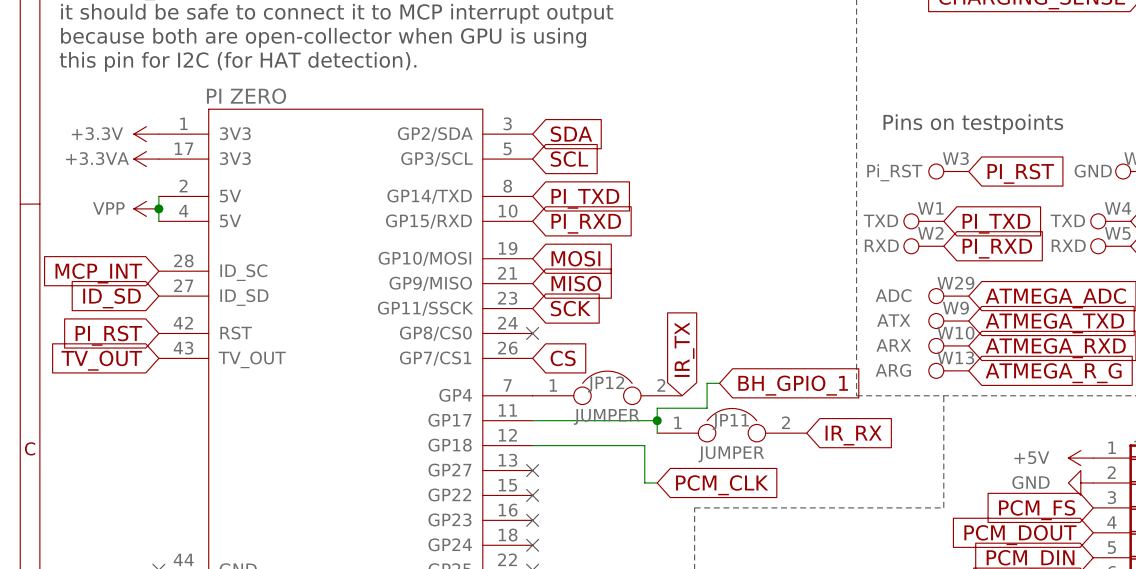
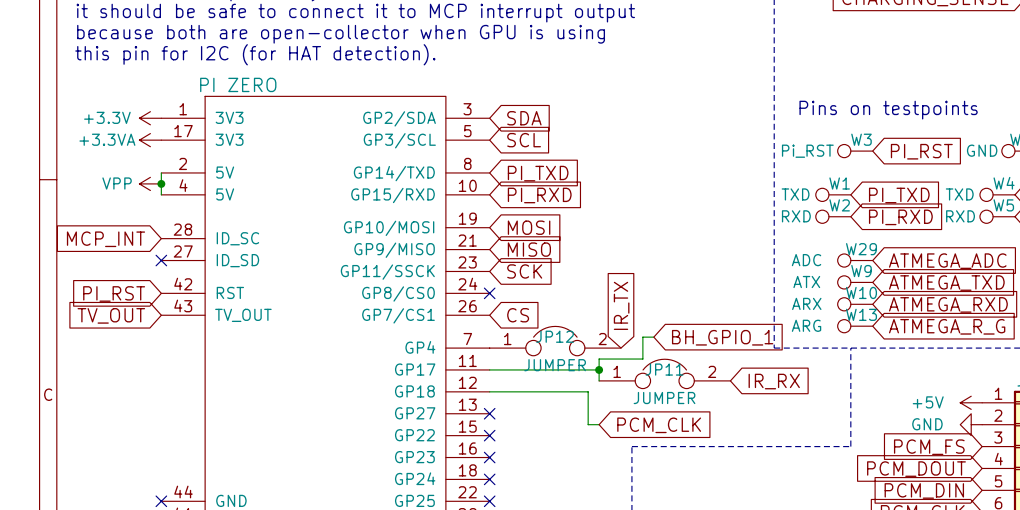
no-connect mark: none -> (161, 260)
global label: ID_SD (112, 298) -> none

